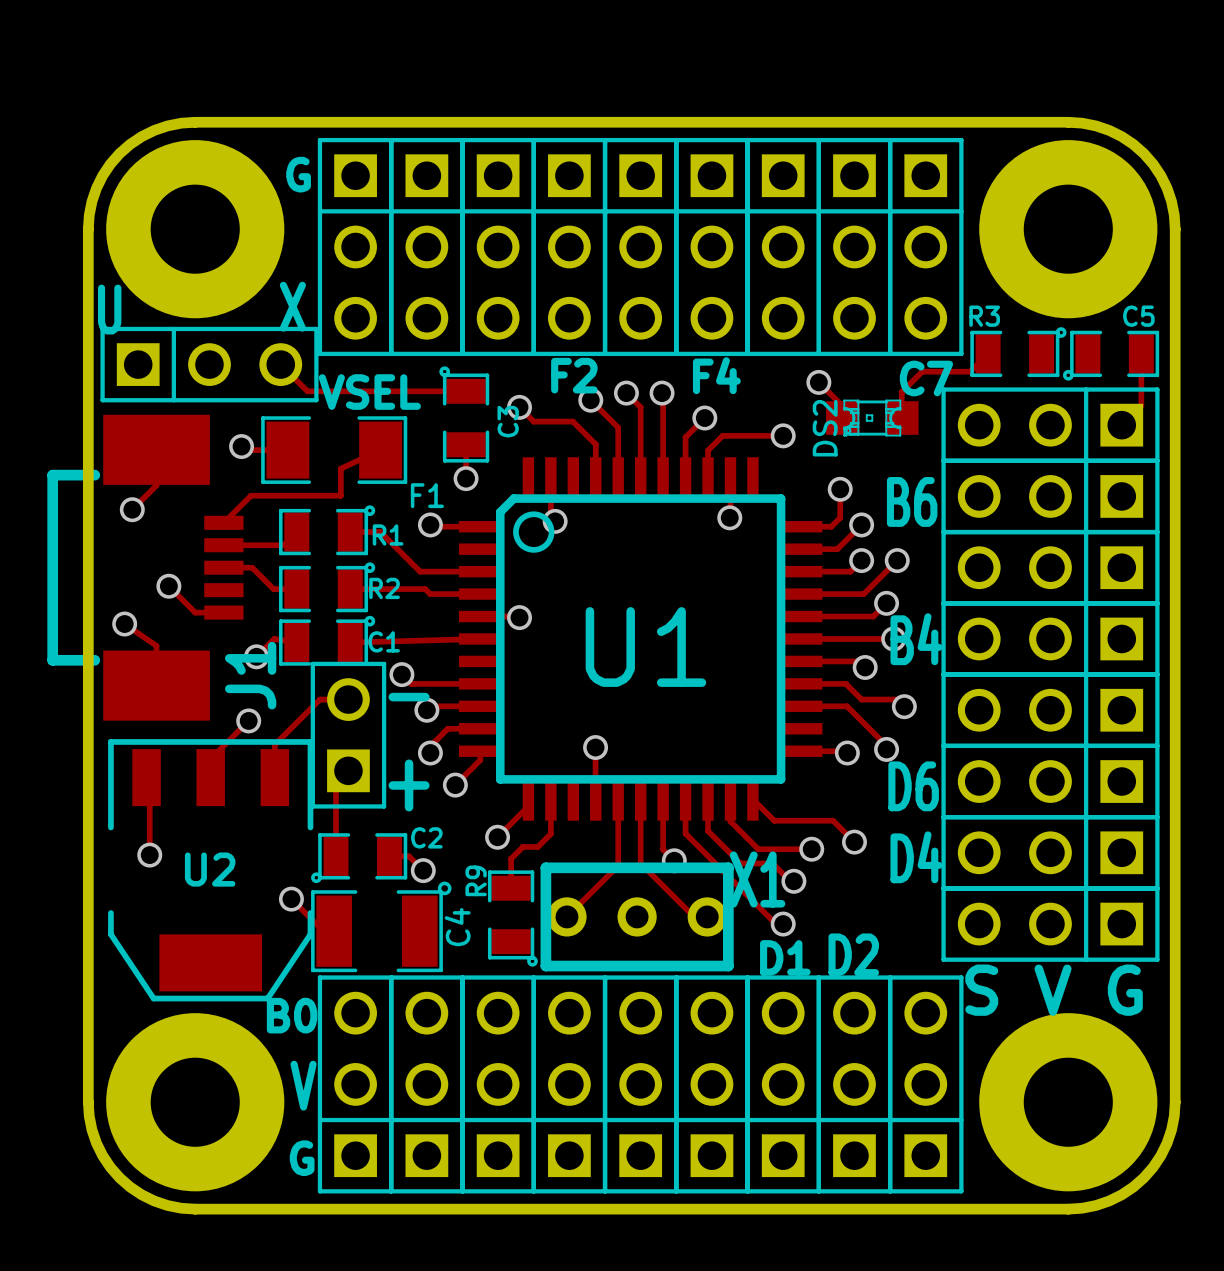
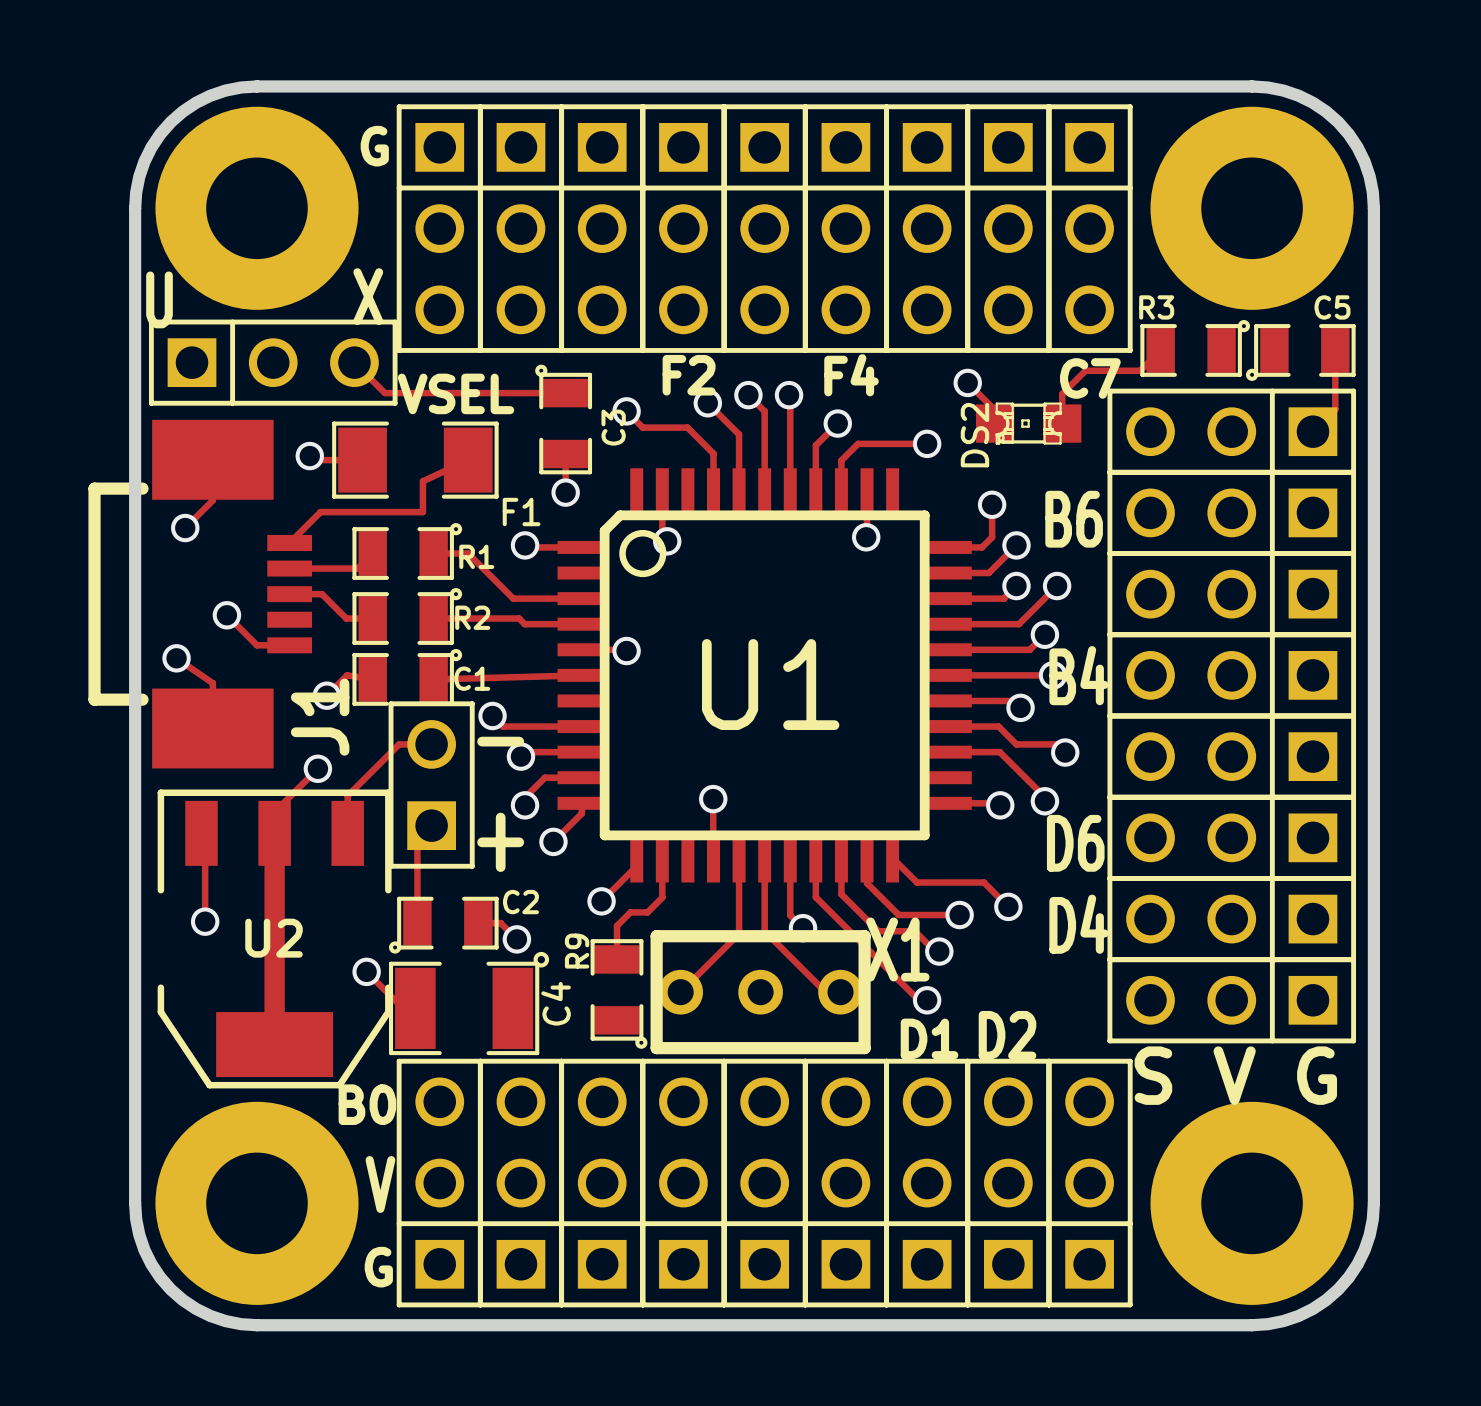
track: none -> (274, 833) (274, 1044)

